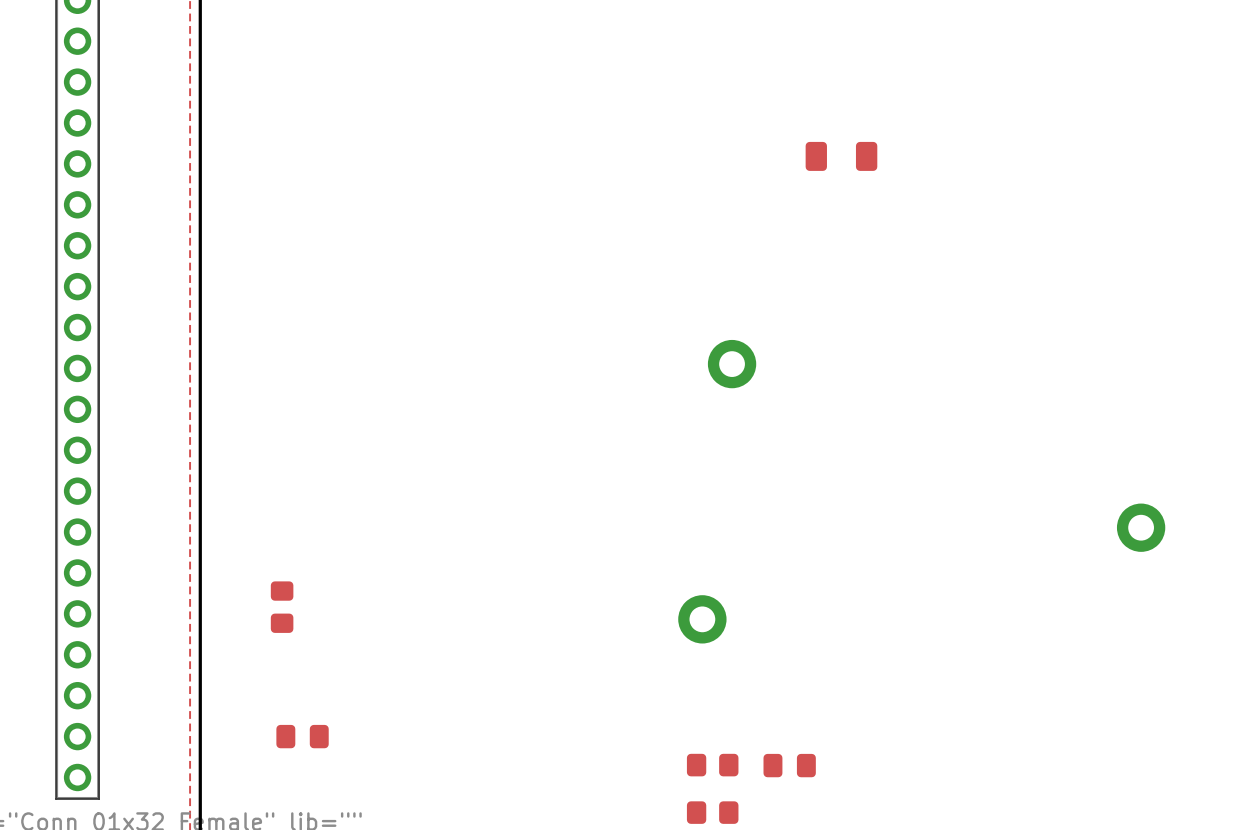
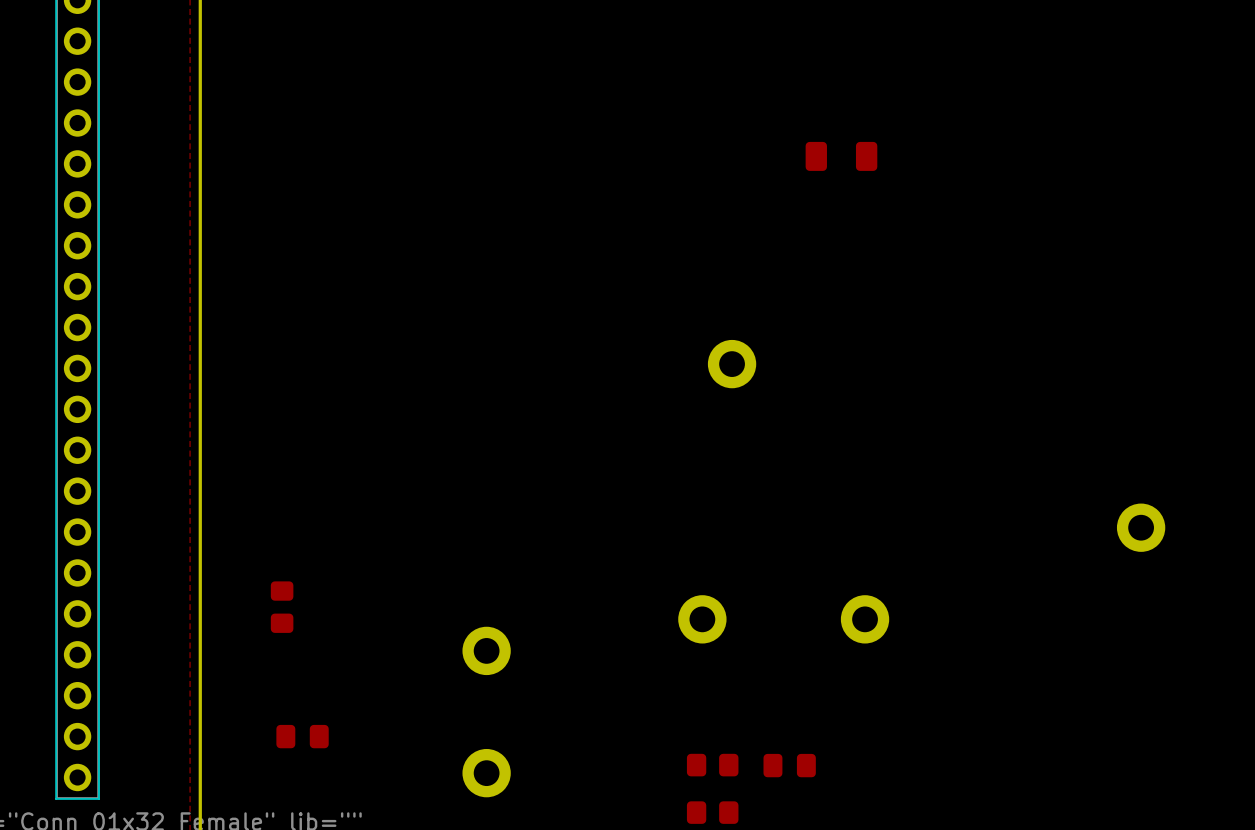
part: none -> (865, 619)
part: none -> (486, 650)
part: none -> (486, 773)

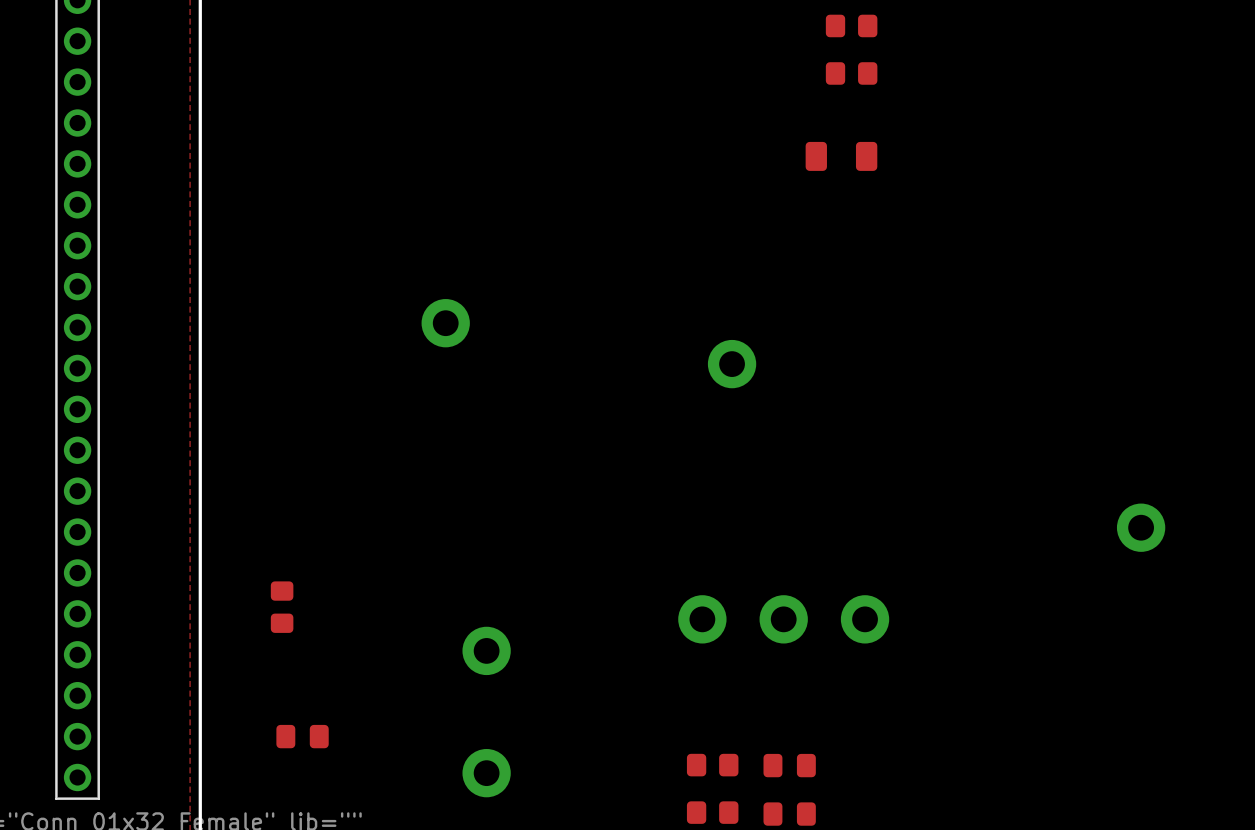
part: none -> (851, 25)
part: none -> (851, 73)
part: none -> (445, 323)
part: none -> (783, 619)
part: none -> (789, 814)

